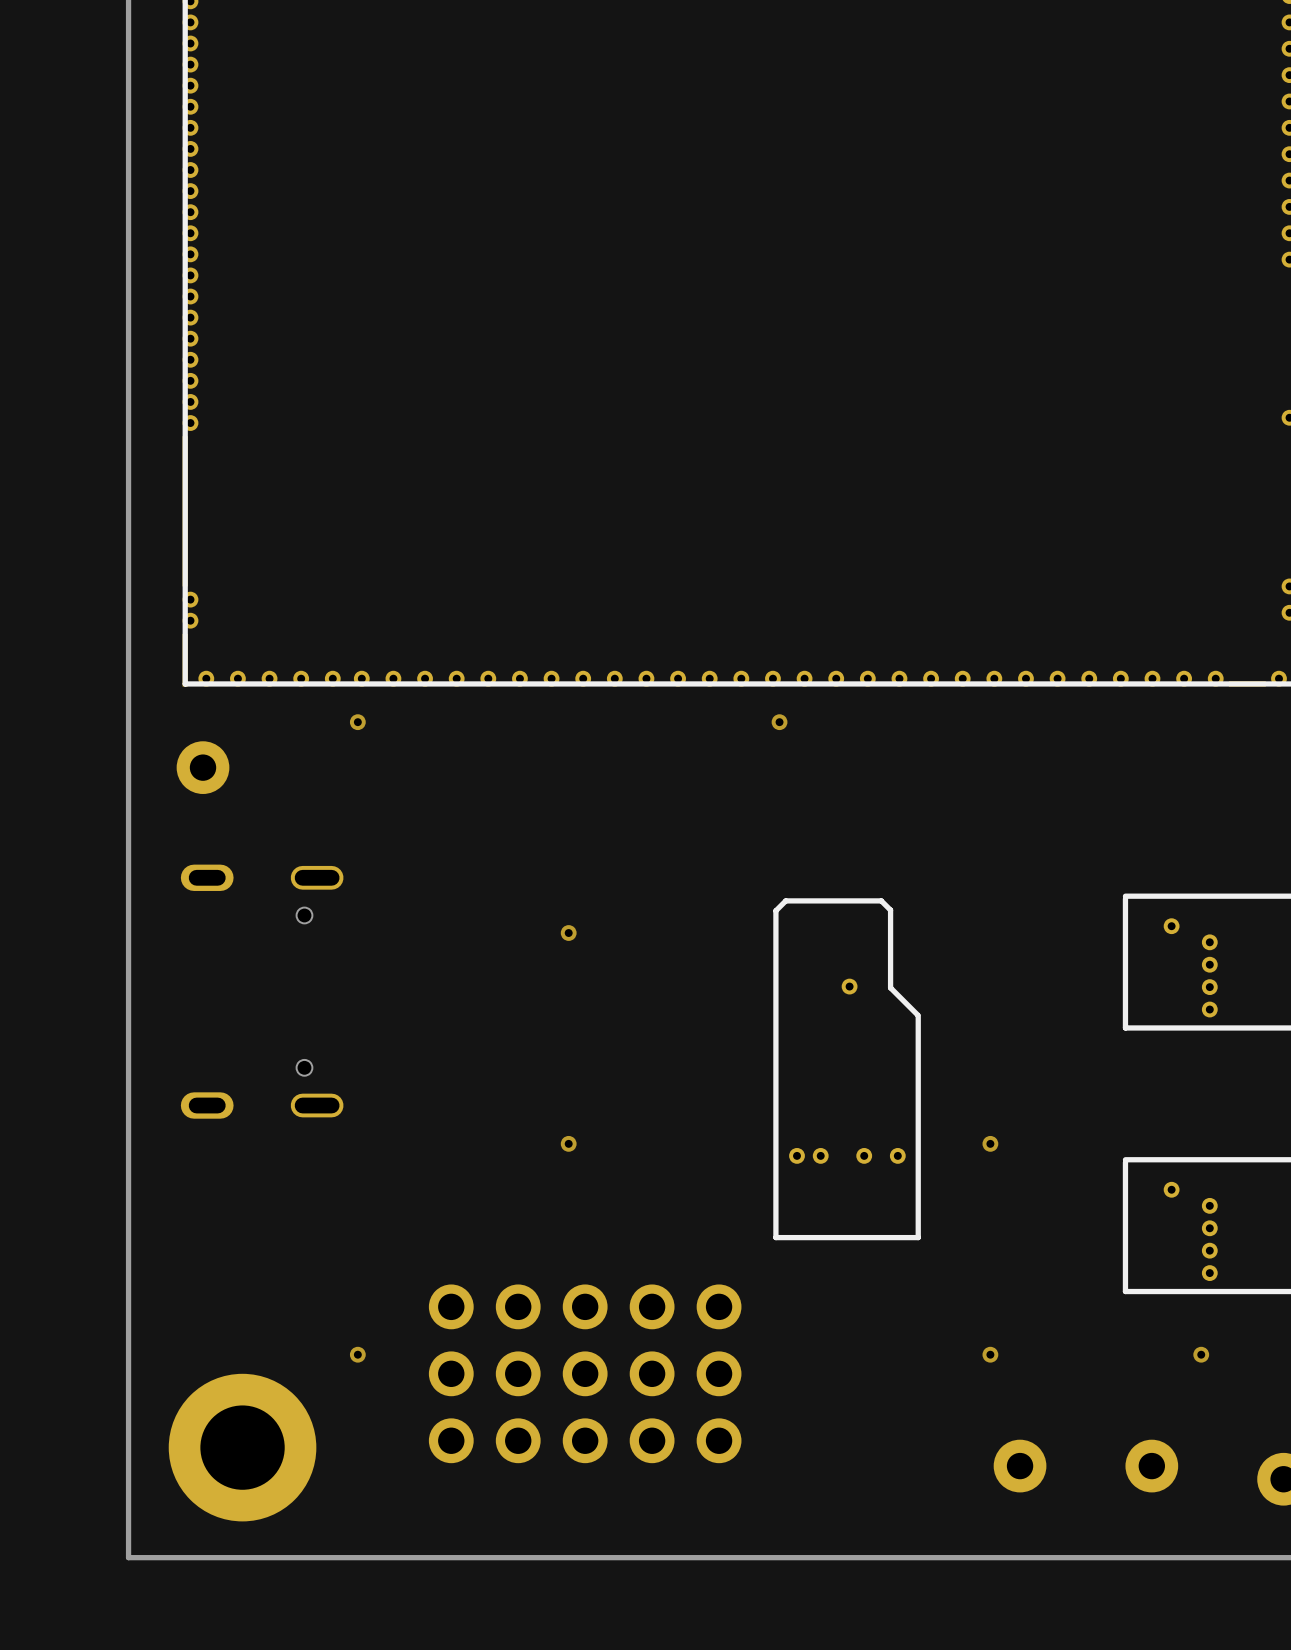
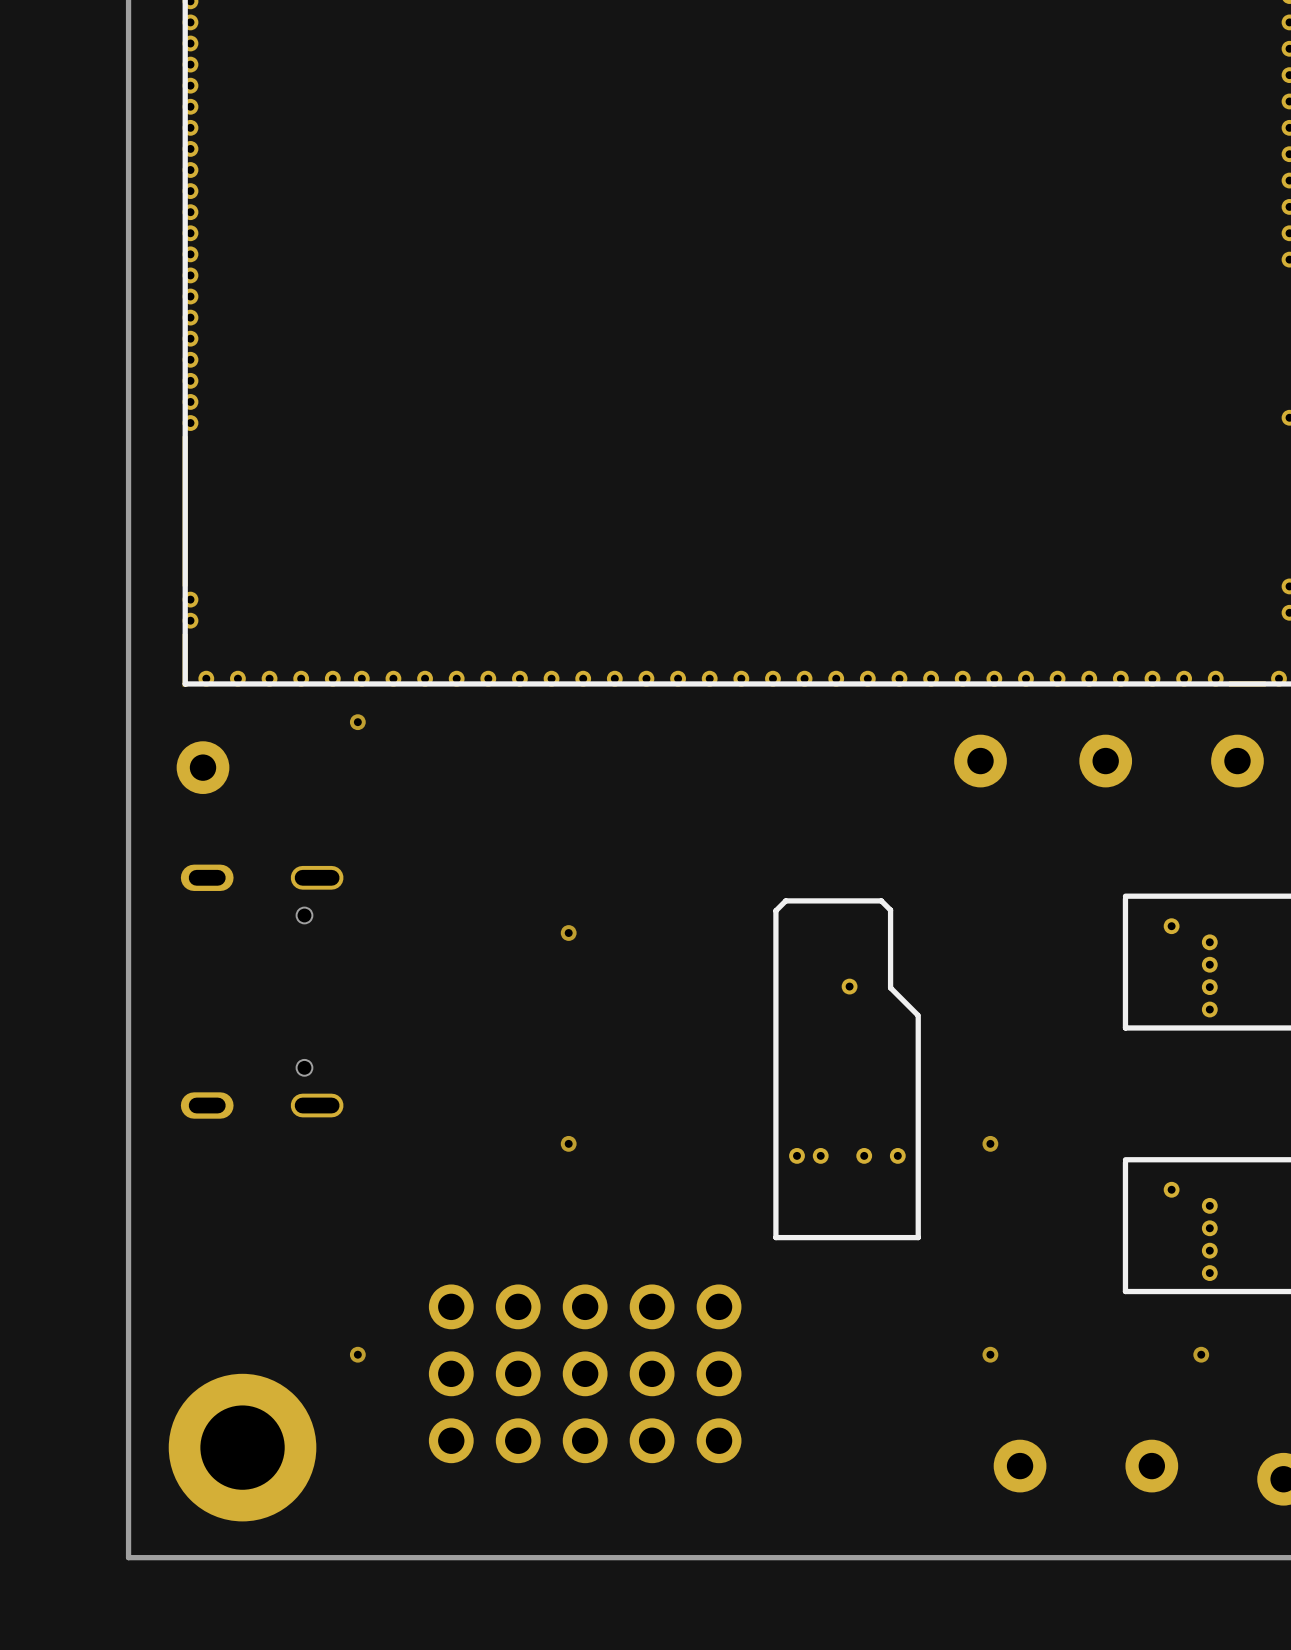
via: (779, 722) -> none
part: none -> (980, 761)
part: none -> (1105, 761)
part: none -> (1237, 761)

